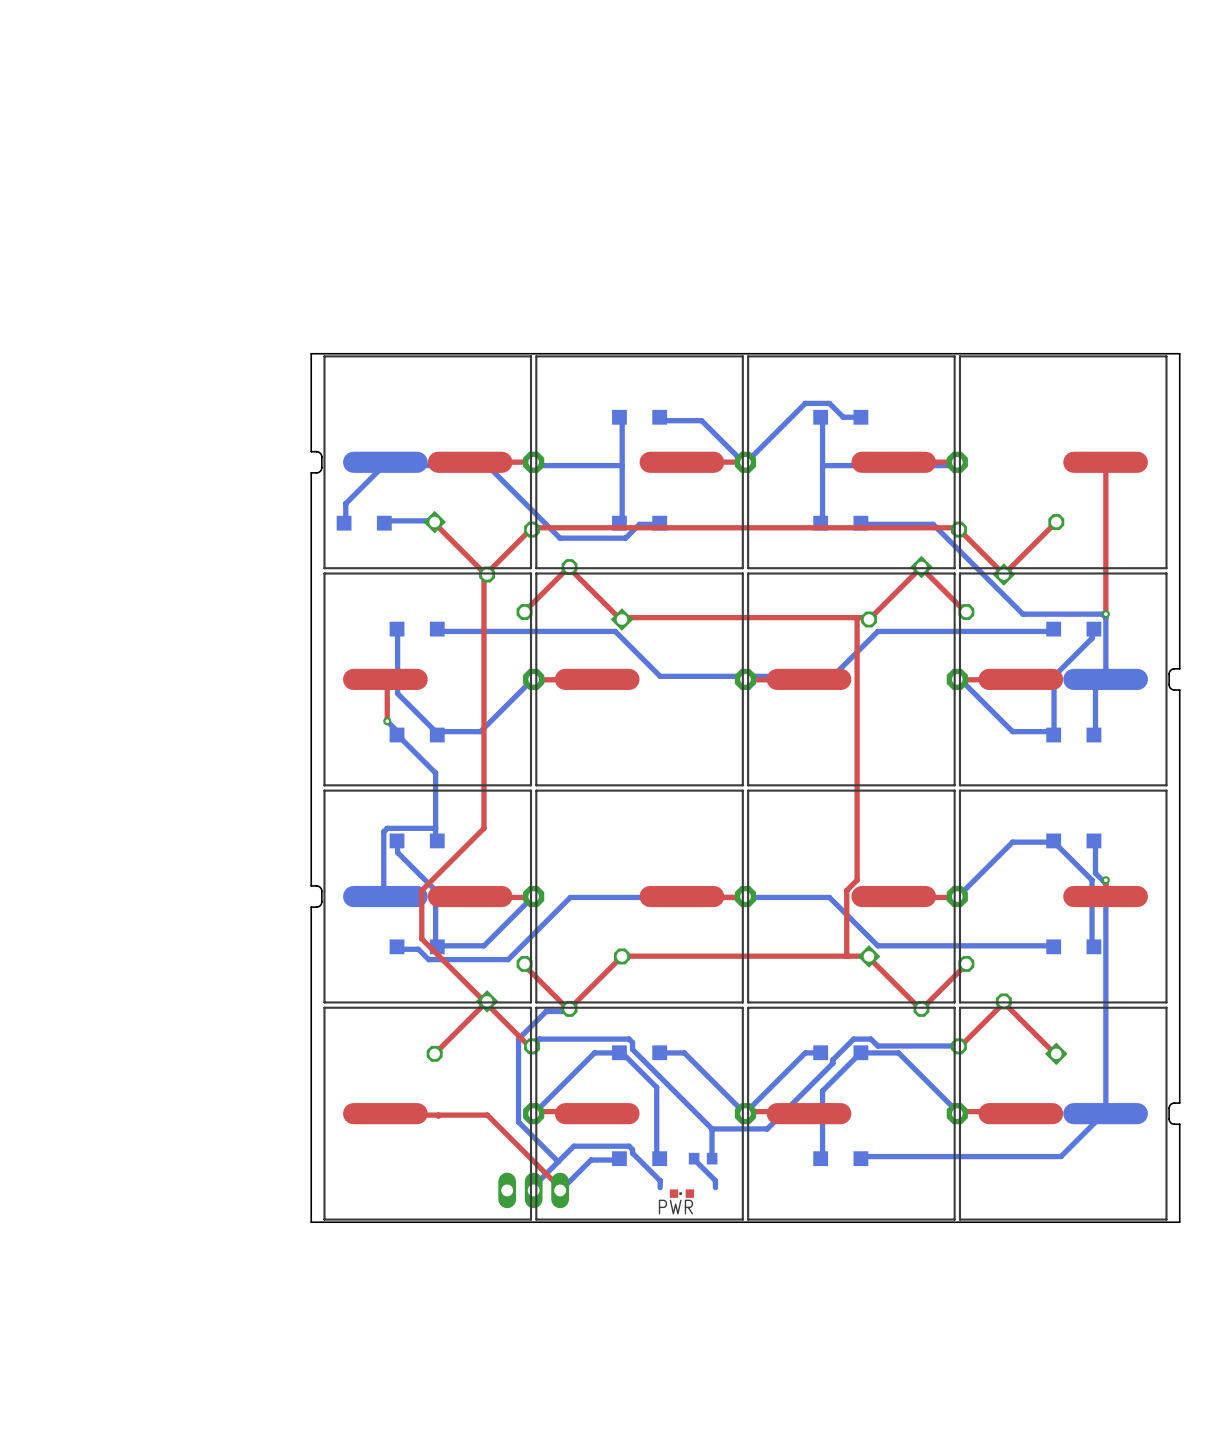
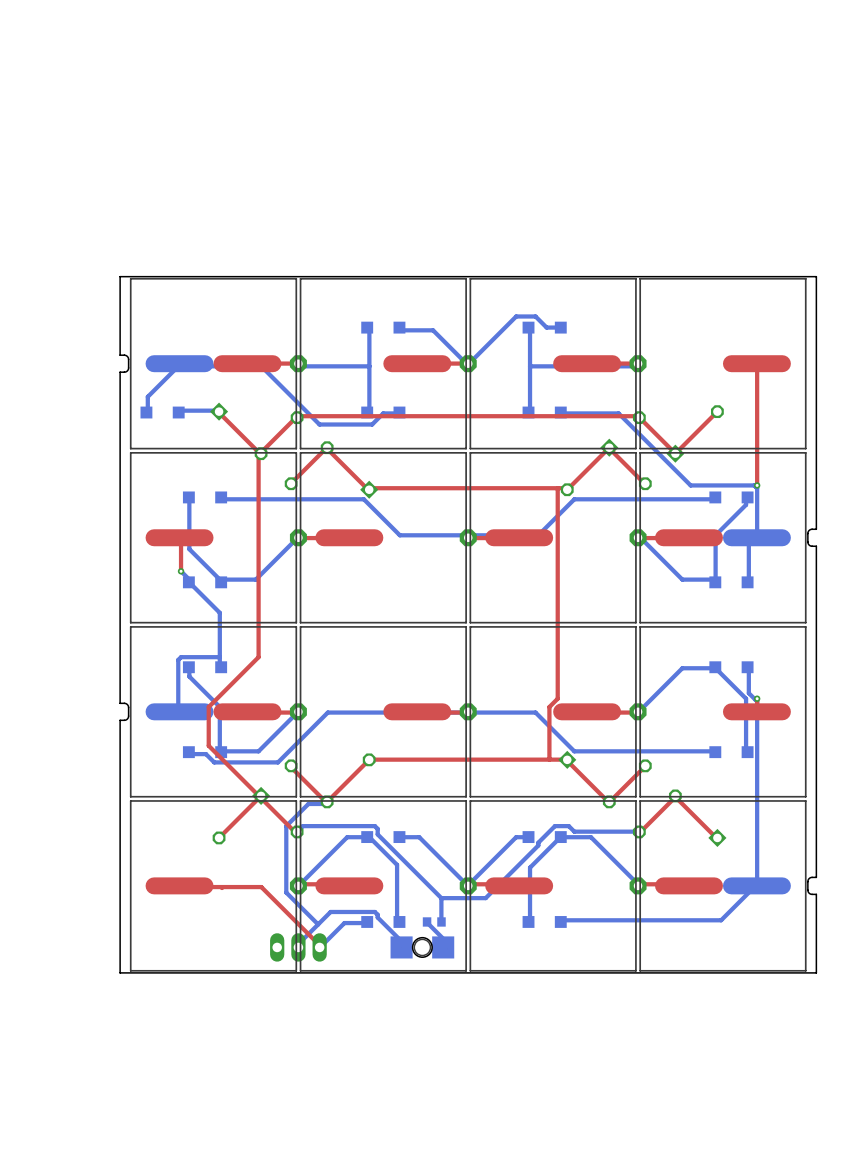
part: none -> (422, 947)
PWR: (681, 1193) -> none

